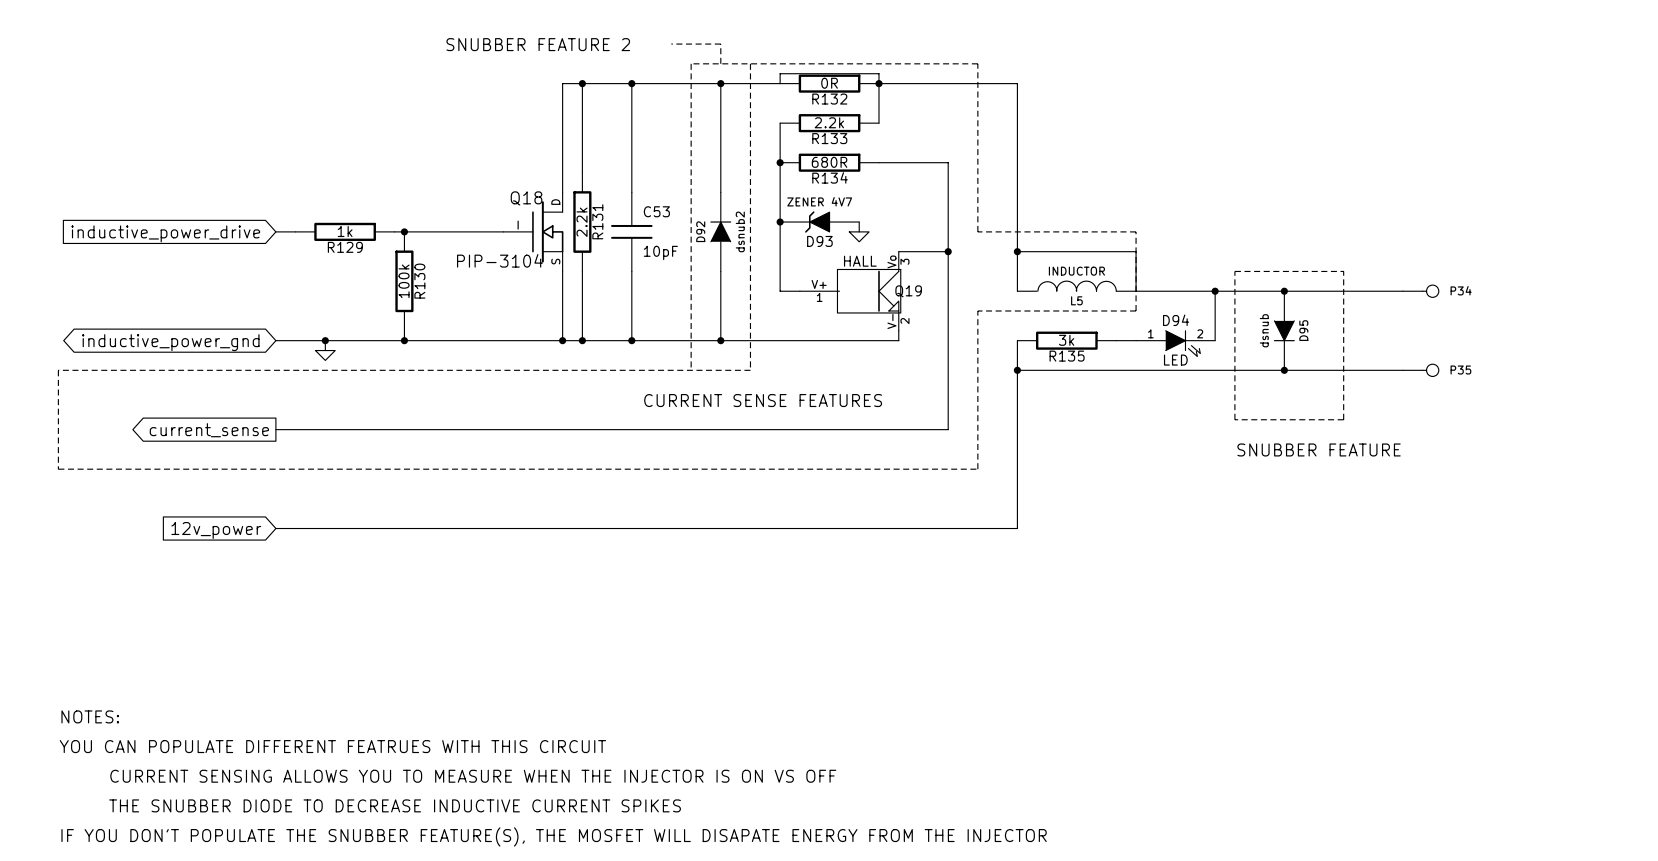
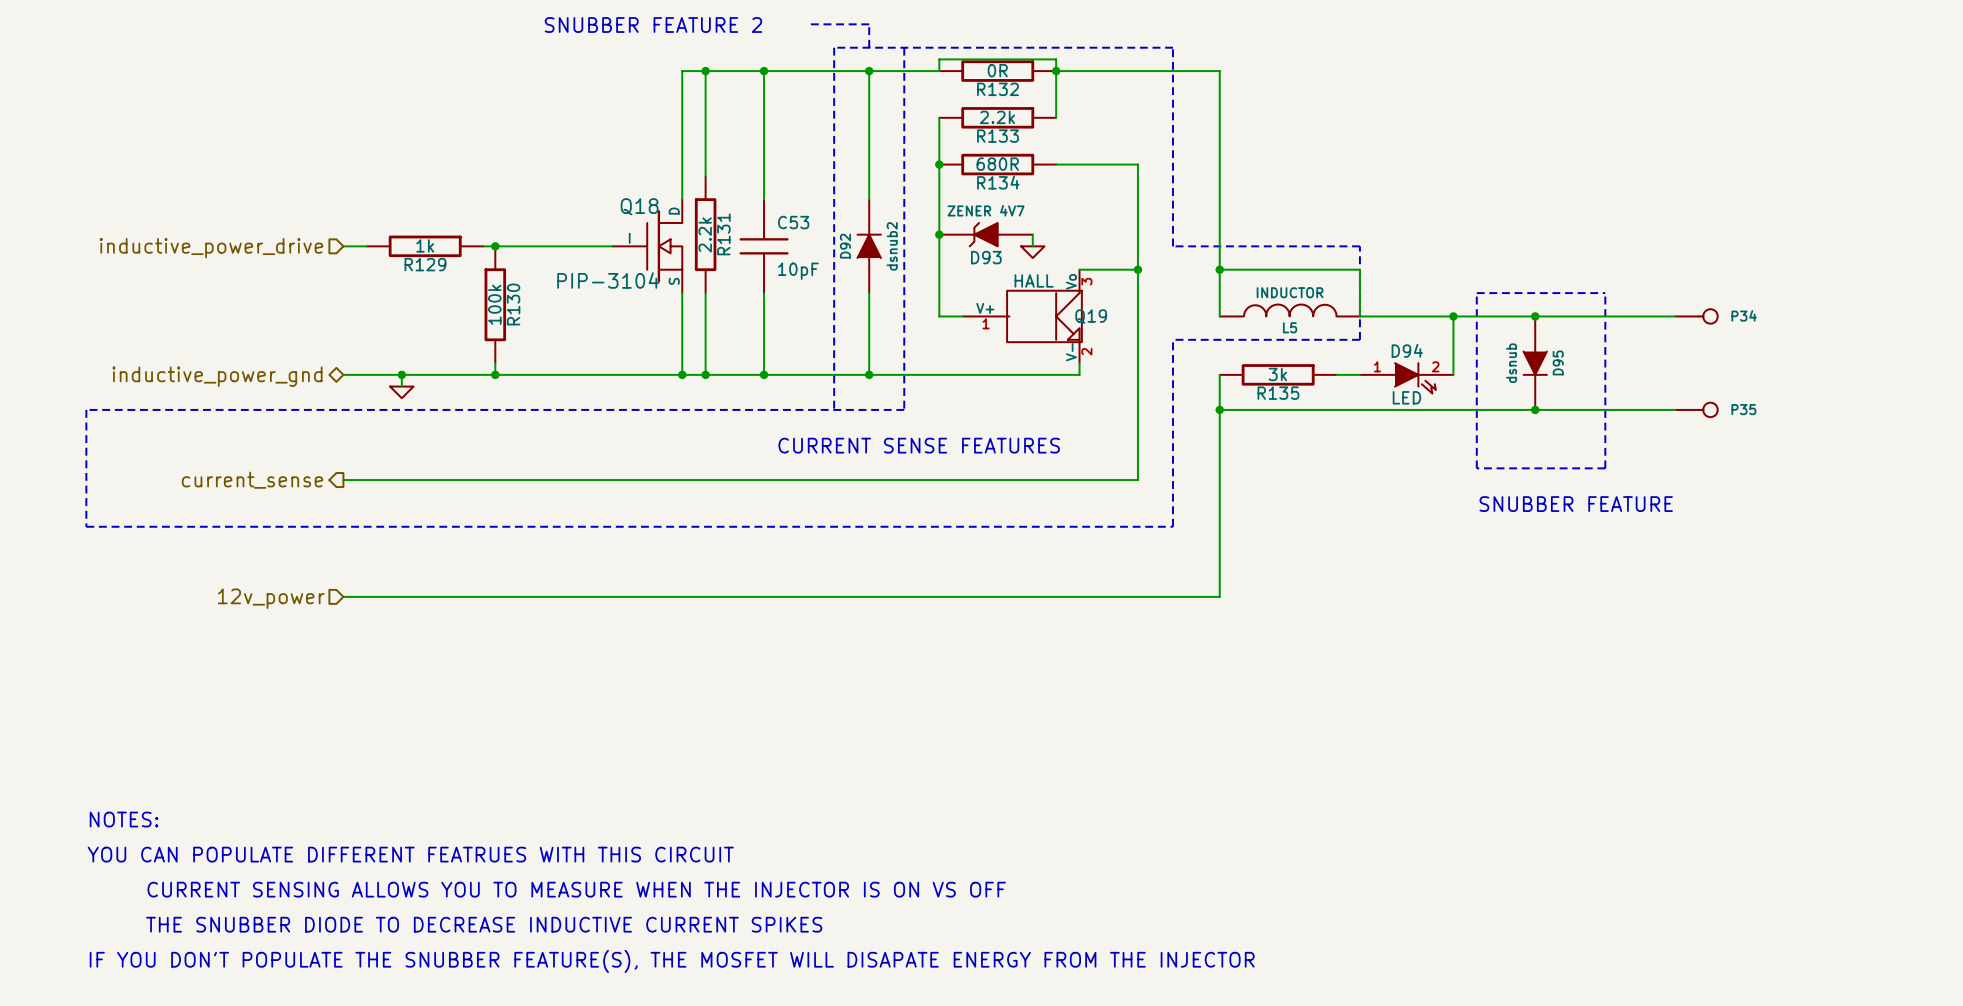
hierarchical label: none -> inductive_power_drive (211, 248)
global label: inductive_power_drive (165, 233) -> none
hierarchical label: none -> inductive_power_gnd (217, 376)
global label: inductive_power_gnd (170, 342) -> none
hierarchical label: none -> current_sense (252, 480)
global label: current_sense (209, 430) -> none
hierarchical label: none -> 12v_power (271, 598)
global label: 12v_power (216, 530) -> none

